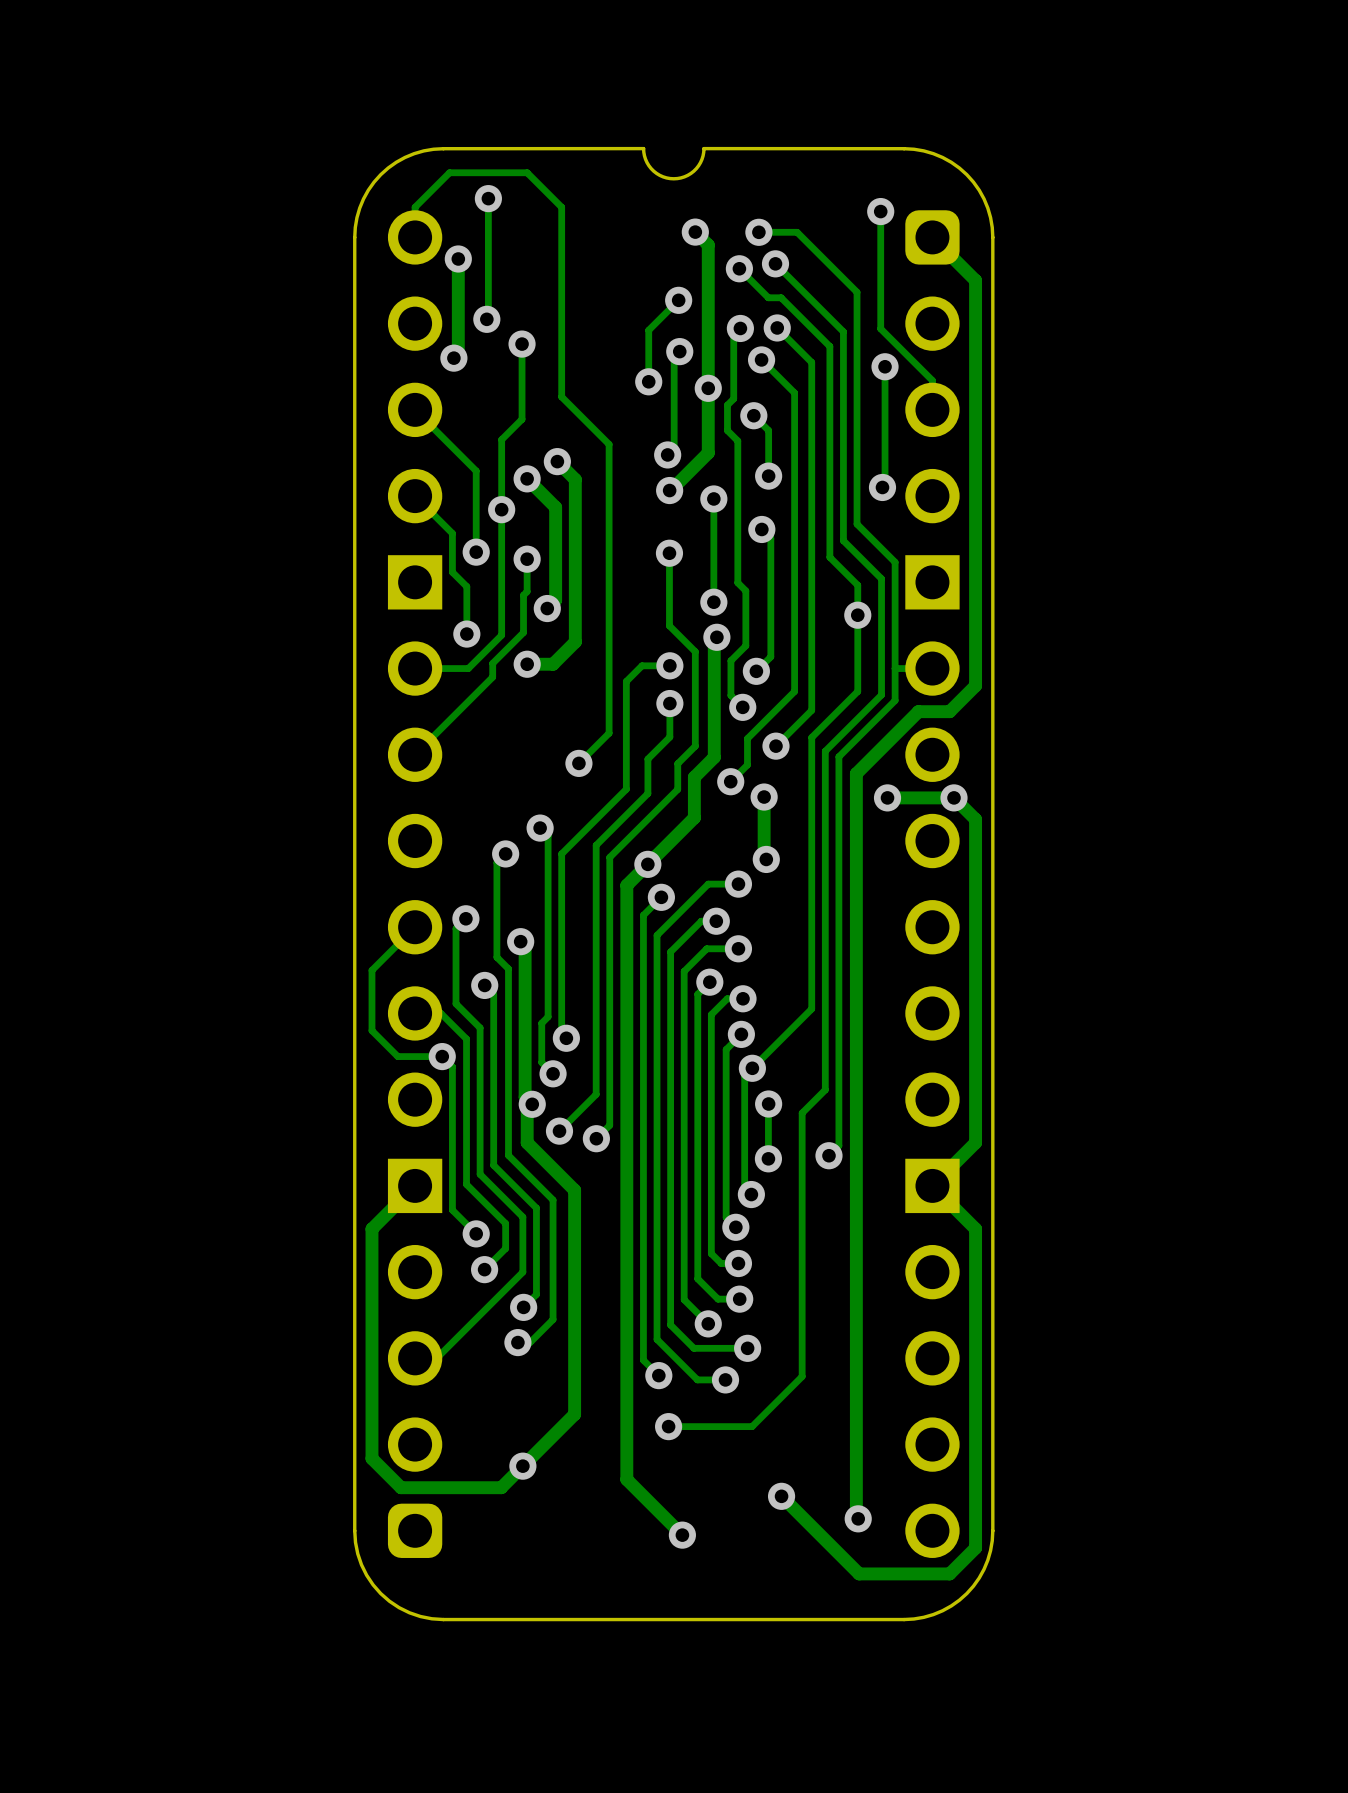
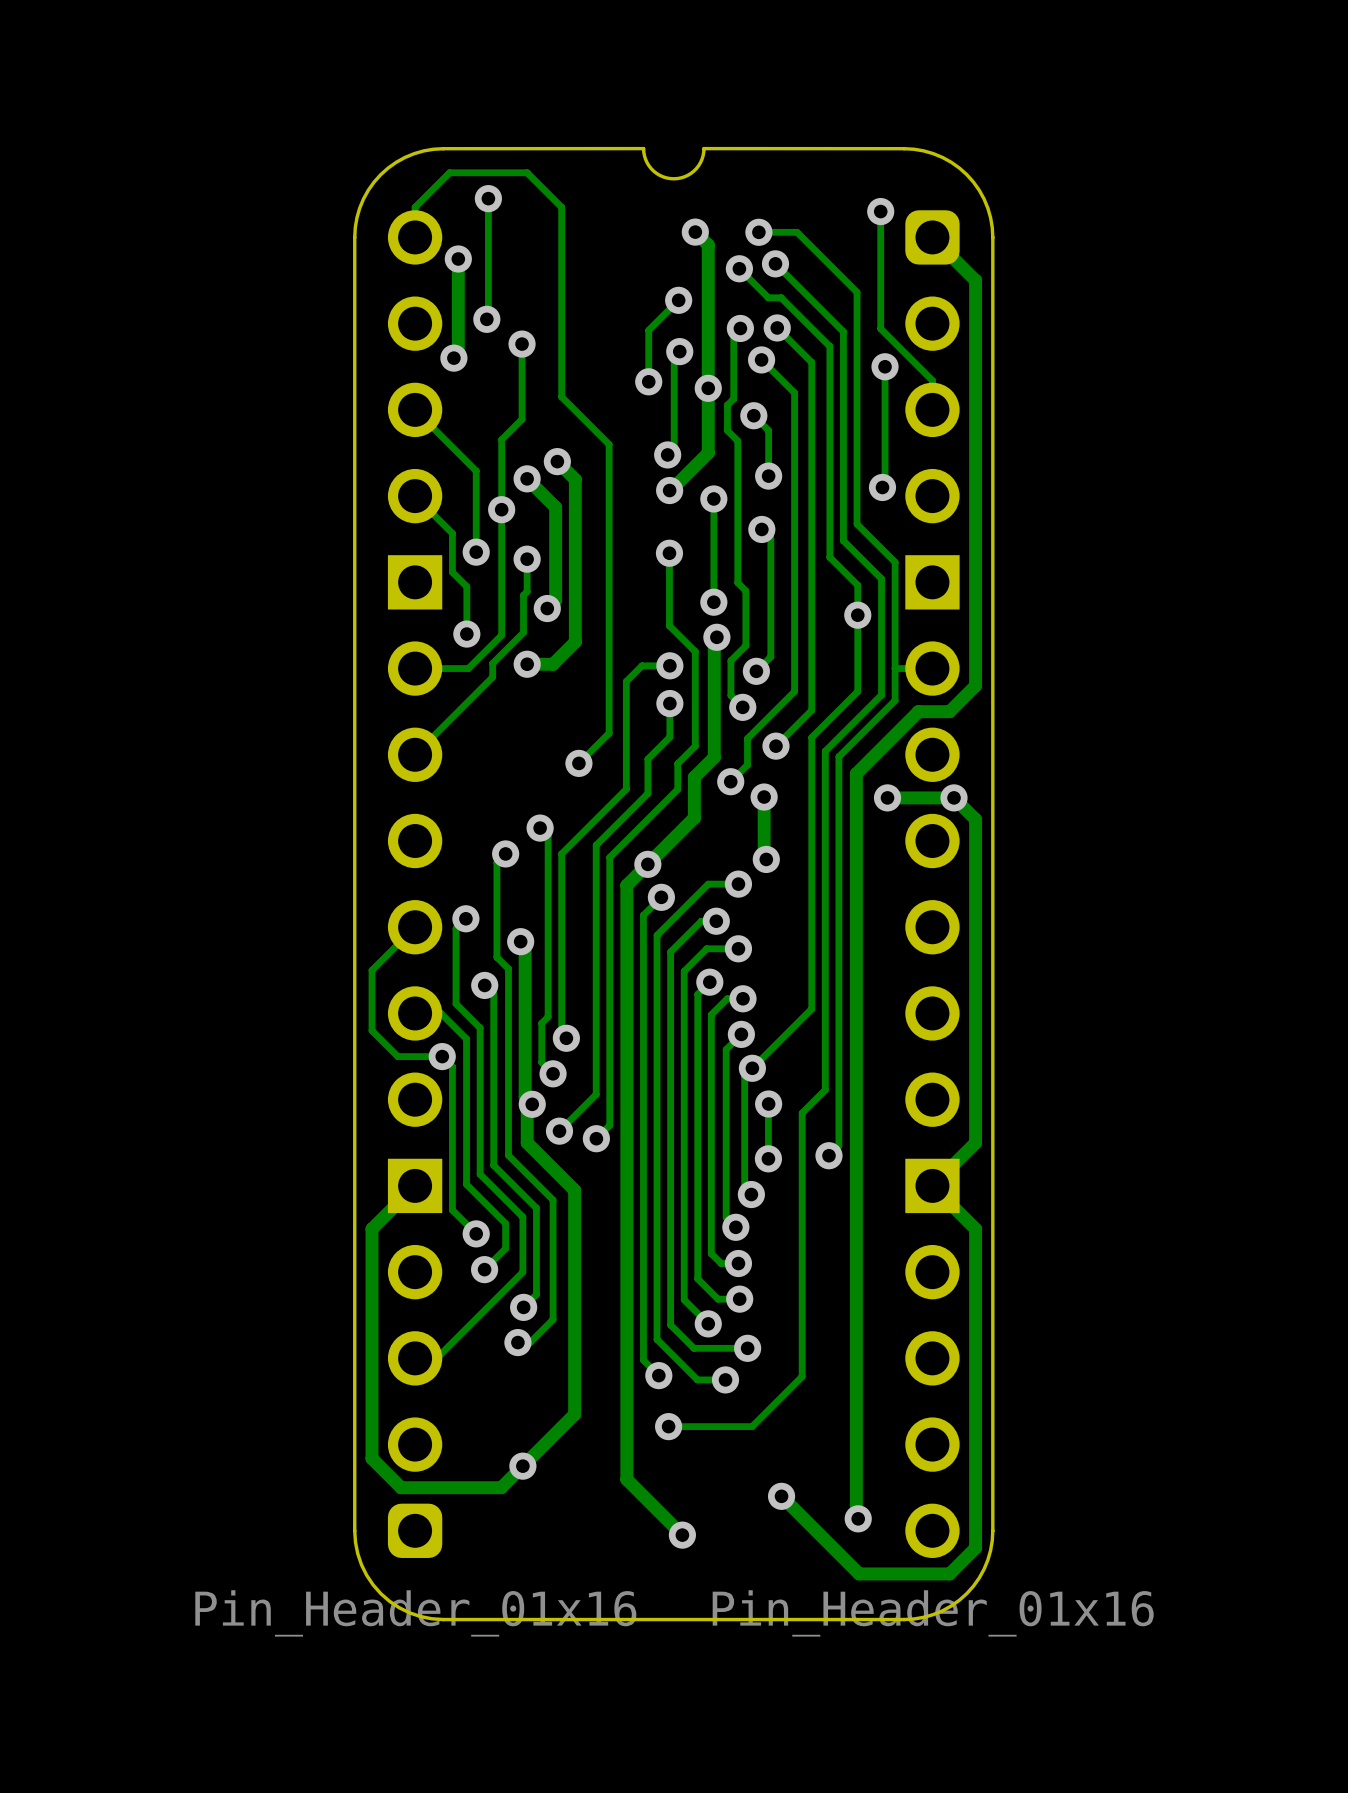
drawing: none -> [195, 1590, 1154, 1637]

